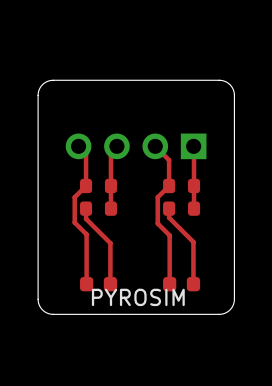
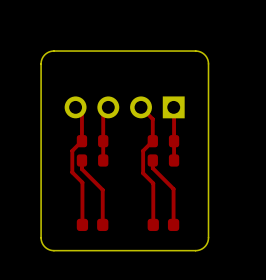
text: PYROSIM (138, 297) -> none

